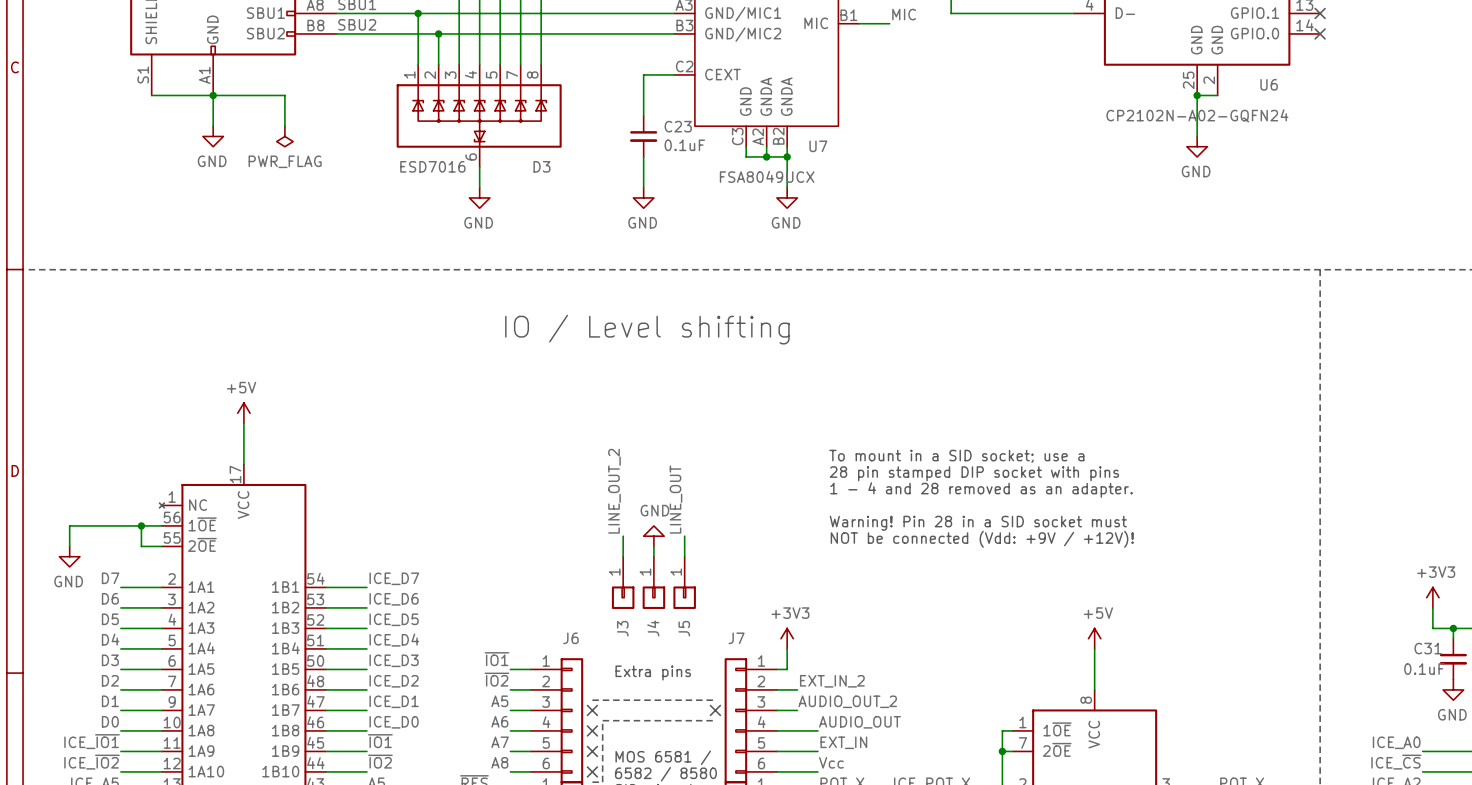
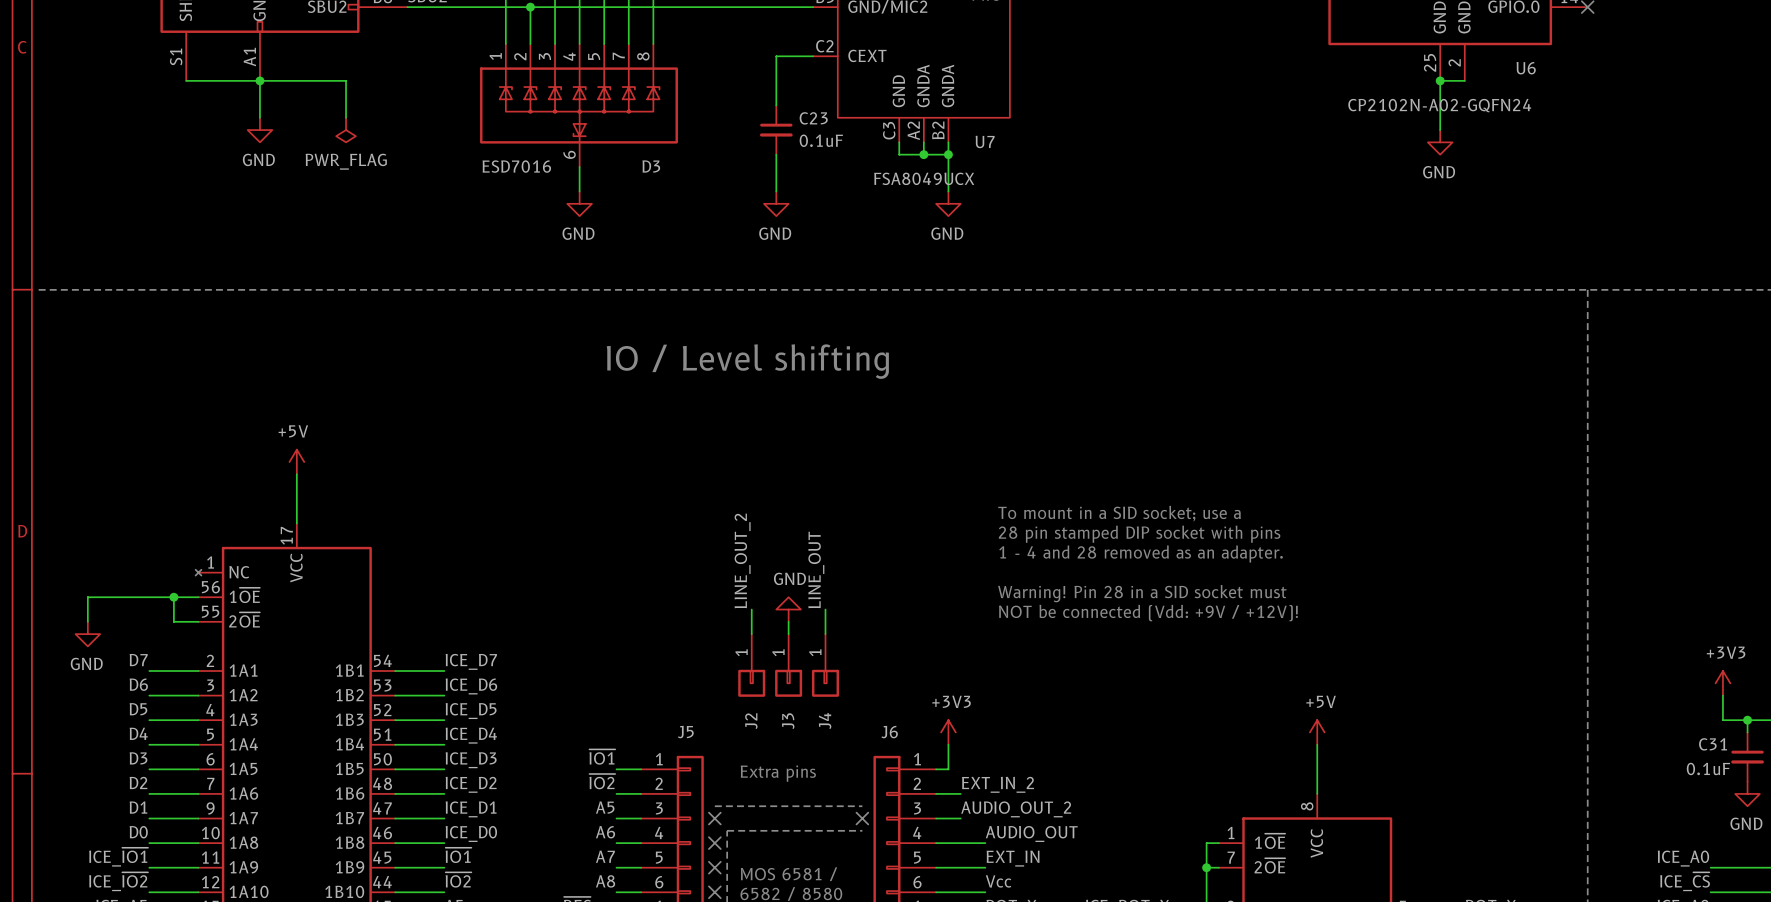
J3 name: J3 (622, 628) -> J2 (751, 721)
J4 name: J4 (653, 628) -> J3 (788, 721)
J5 name: J5 (684, 628) -> J4 (825, 720)
J6 name: J6 (571, 638) -> J5 (685, 732)
J7 name: J7 (736, 638) -> J6 (889, 732)

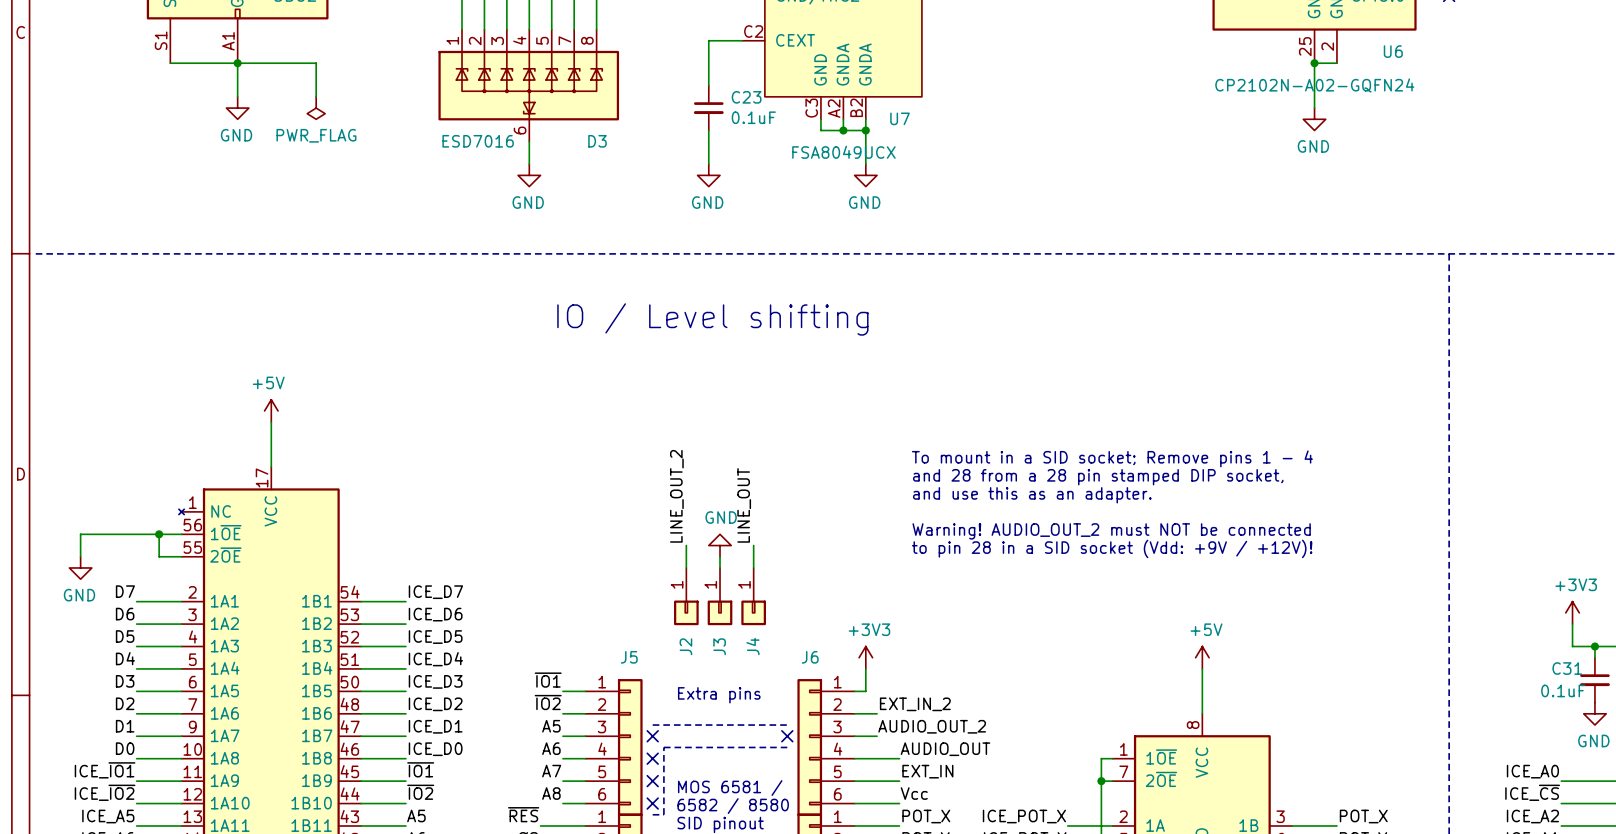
text: To mount in a SID socket; use a (1119, 513) -> To mount in a SID socket; Remove pins 1 - 4 (1112, 458)
text: 28 pin stamped DIP socket with pins (1139, 534) -> and 28 from a 28 pin stamped DIP socket, (1098, 477)
text: 1 - 4 and 28 removed as an adapter. (1141, 553) -> and use this as an adapter. (1032, 495)
text: Warning! Pin 28 in a SID socket must (1142, 593) -> Warning! AUDIO_OUT_2 must NOT be connected (1111, 531)
text: NOT be connected (Vdd: +9V / +12V)! (1148, 613) -> to pin 28 in a SID socket (Vdd: +9V / +12V)! (1112, 548)

